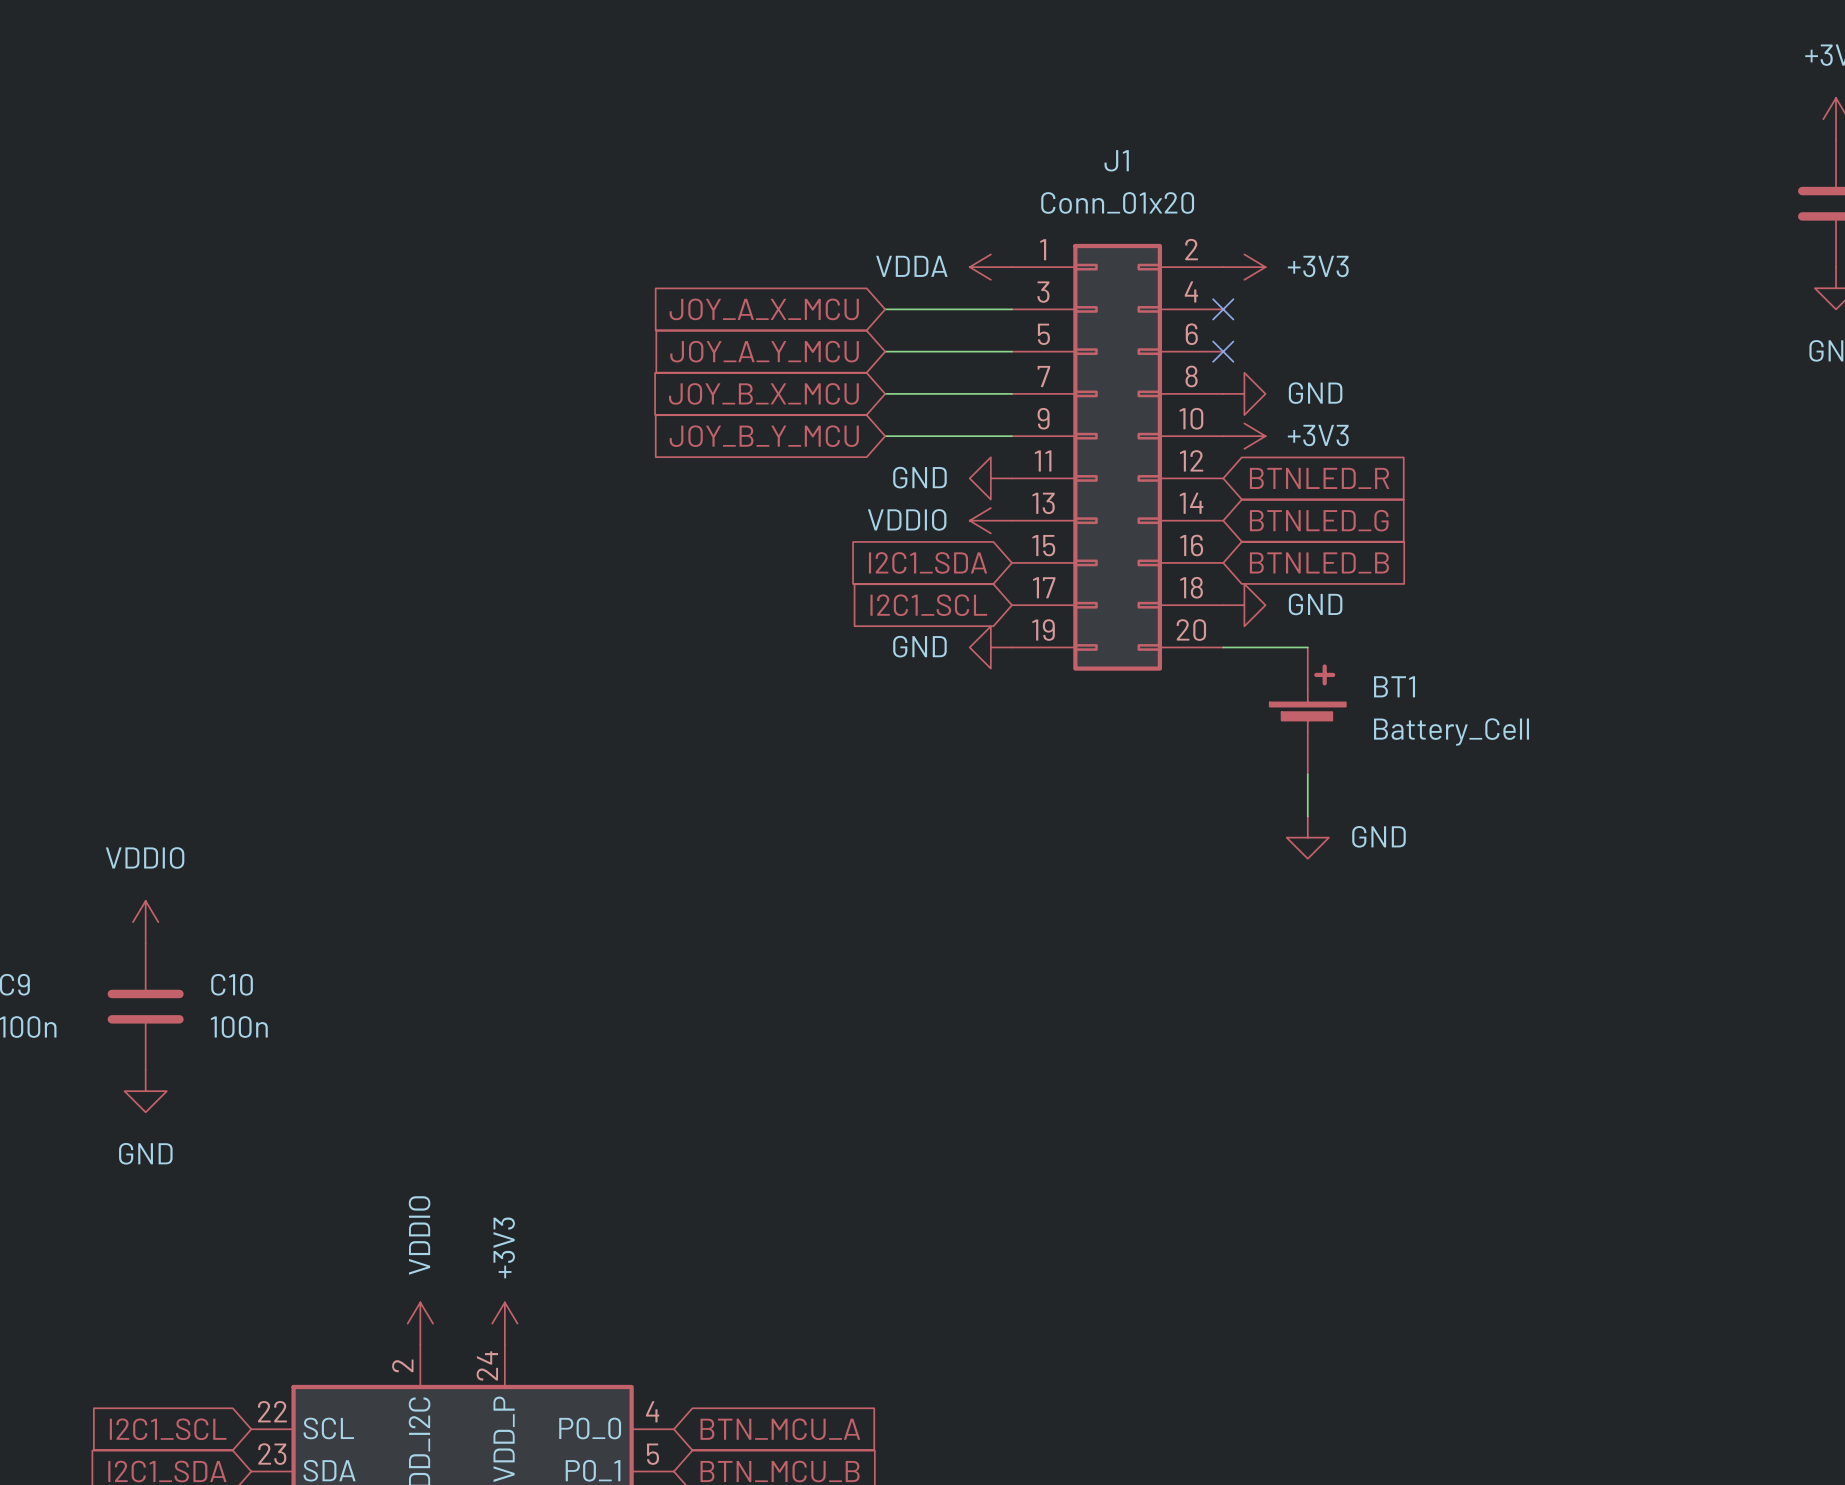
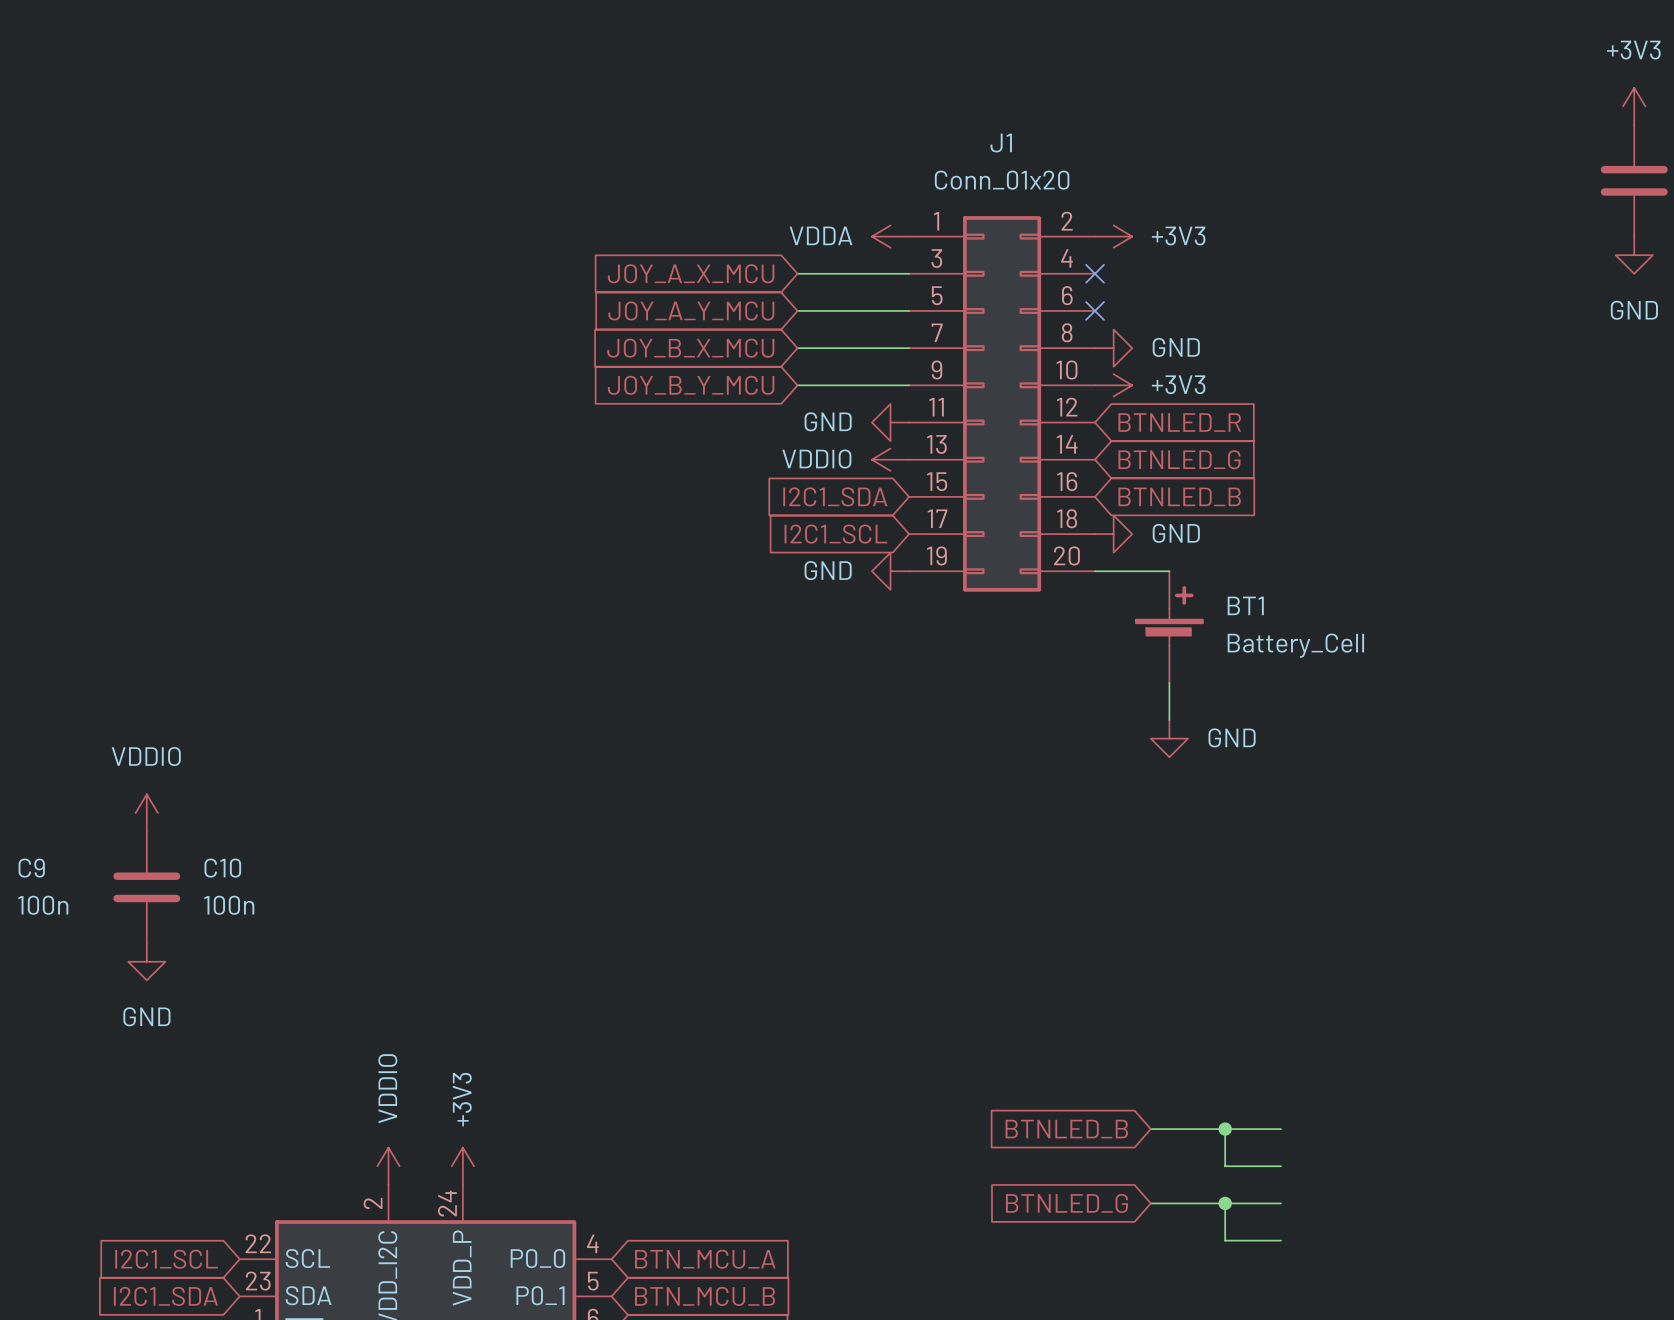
global label: none -> BTNLED_B (1066, 1129)
wire: none -> (1150, 1129) (1280, 1129)
wire: none -> (1225, 1129) (1225, 1166) (1280, 1166)
junction: none -> (1225, 1129)
global label: none -> BTNLED_G (1066, 1203)
wire: none -> (1150, 1203) (1280, 1203)
wire: none -> (1225, 1203) (1225, 1240) (1280, 1240)
junction: none -> (1225, 1203)

